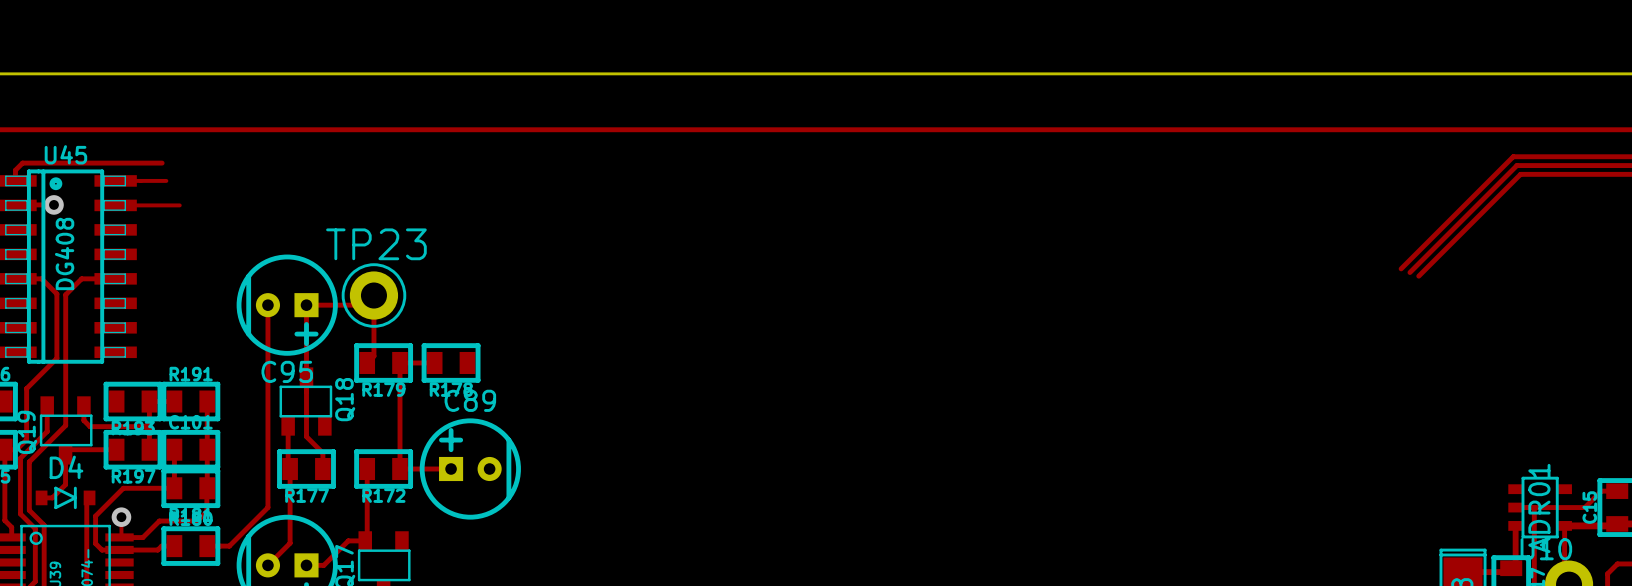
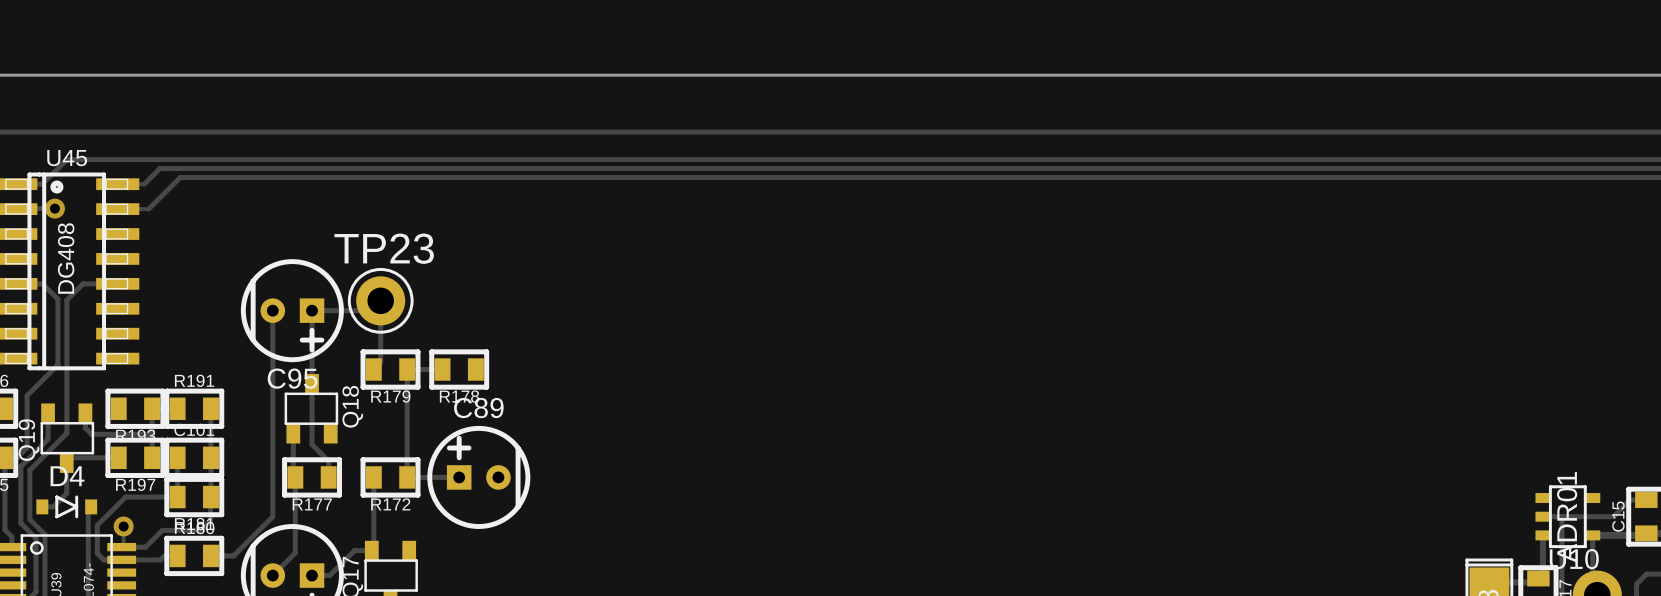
track: (1513, 156) (1401, 268) -> none
track: (162, 163) (22, 163) (15, 170) (15, 180) -> (1540, 159) (66, 159) (42, 184) (15, 184)
track: (1516, 165) (1409, 272) -> (1544, 168) (159, 168) (144, 184)
track: (1520, 174) (1418, 276) -> (1547, 177) (180, 177) (148, 209)
track: (141, 180) (166, 180) -> none
track: (146, 205) (179, 205) -> none

